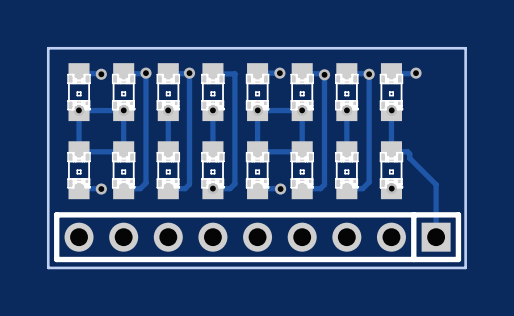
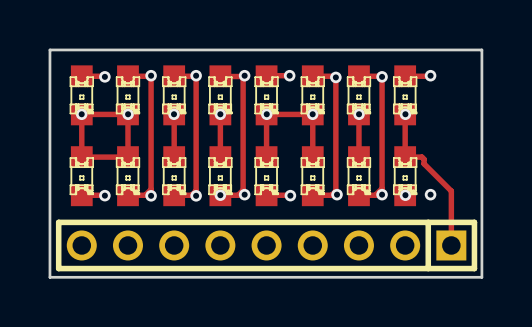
via: none -> (244, 75)
track: (257, 151) (302, 151) -> none
via: none -> (244, 194)
via: none -> (337, 194)
via: none -> (382, 194)
via: none -> (430, 194)
via: none -> (151, 195)
via: none -> (196, 195)

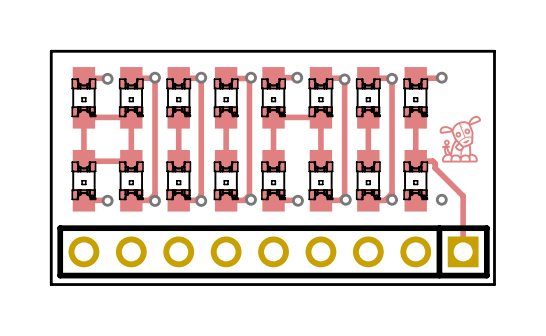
drawing: none -> [439, 115, 481, 163]
via: (81, 114) -> none
via: (128, 114) -> none
via: (174, 114) -> none
via: (220, 114) -> none
via: (266, 114) -> none
via: (312, 114) -> none
via: (359, 114) -> none
via: (405, 114) -> none
via: (220, 195) -> none
via: (405, 195) -> none

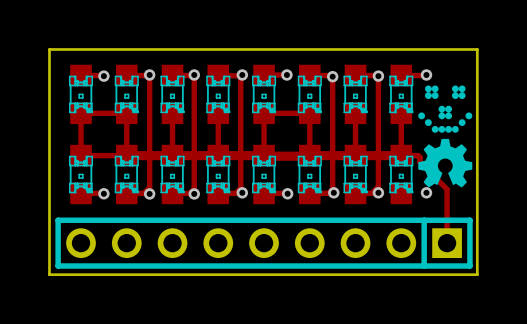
drawing: none -> [418, 85, 473, 188]
drawing: [439, 115, 481, 163] -> none
track: none -> (126, 155) (401, 155)

